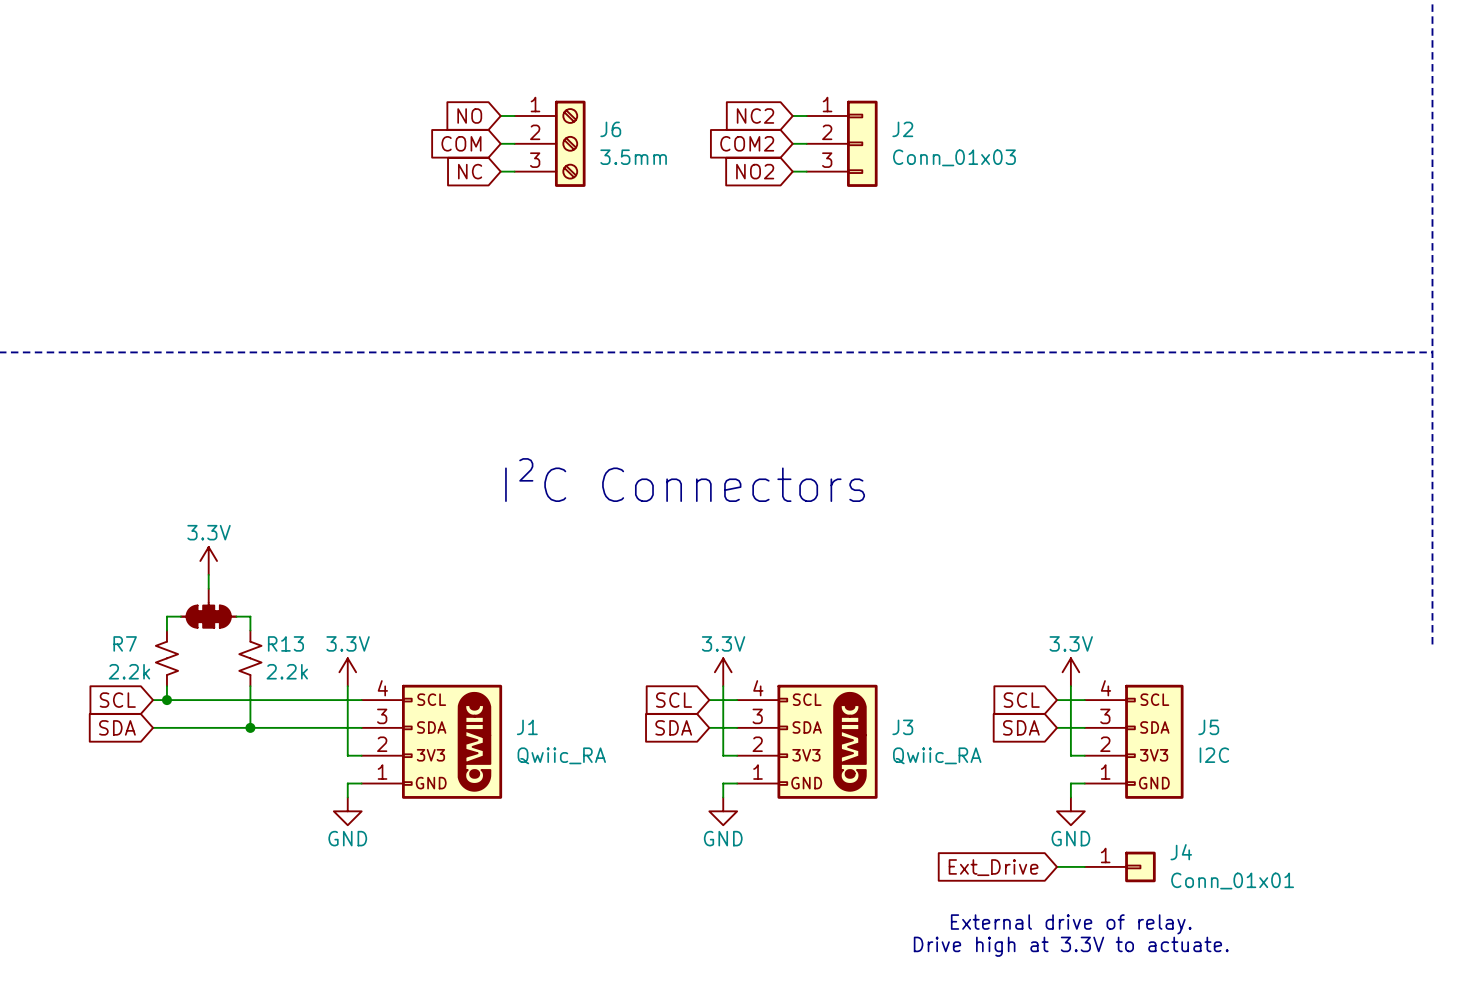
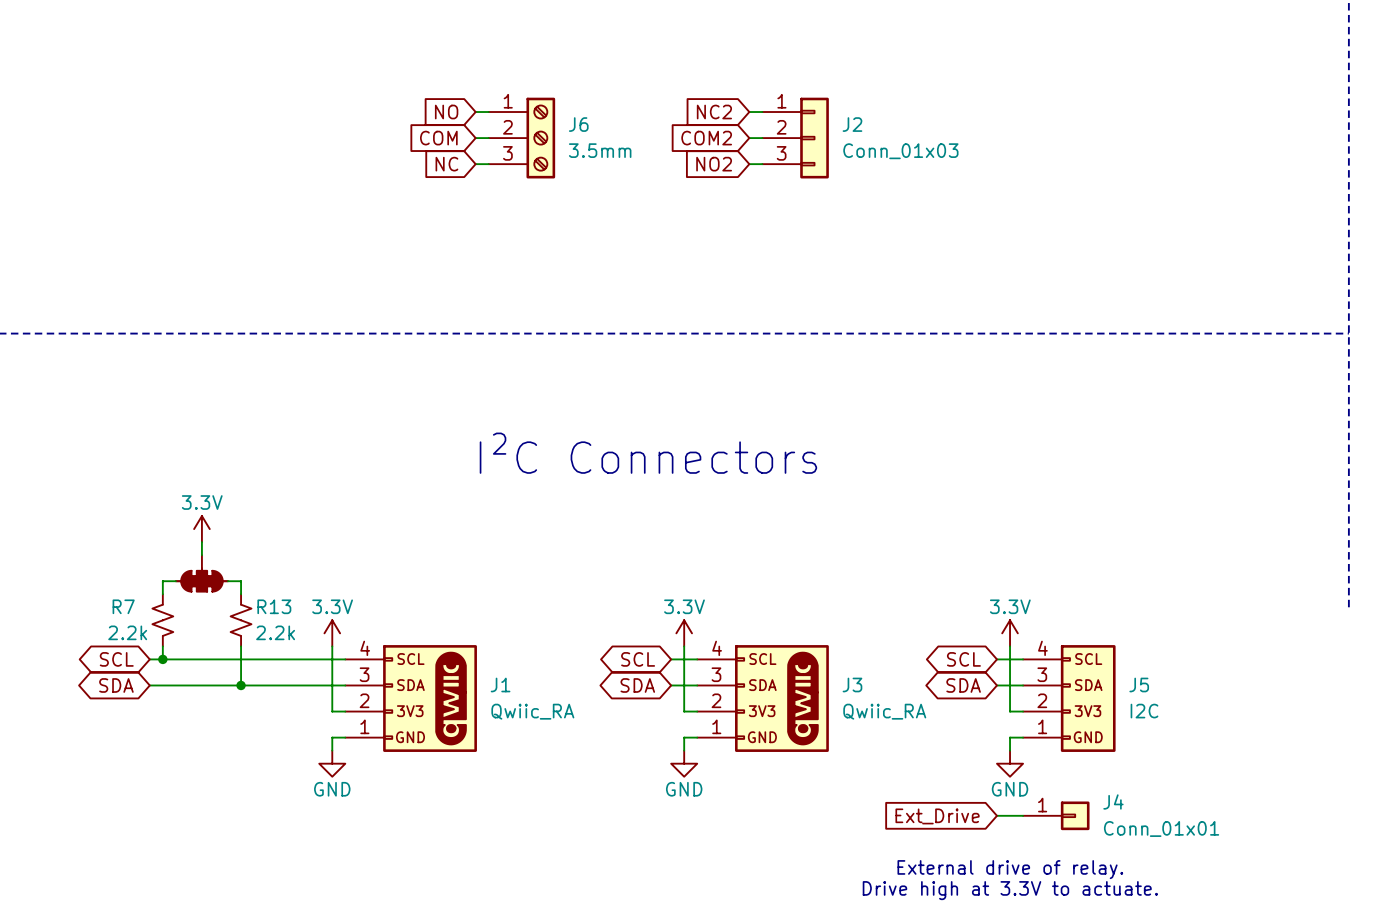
global label shape: input (117, 700) -> bidirectional (116, 659)
global label shape: input (674, 700) -> bidirectional (638, 659)
global label shape: input (1021, 700) -> bidirectional (963, 659)
global label shape: input (117, 727) -> bidirectional (116, 685)
global label shape: input (673, 727) -> bidirectional (637, 685)
global label shape: input (1021, 727) -> bidirectional (963, 685)

